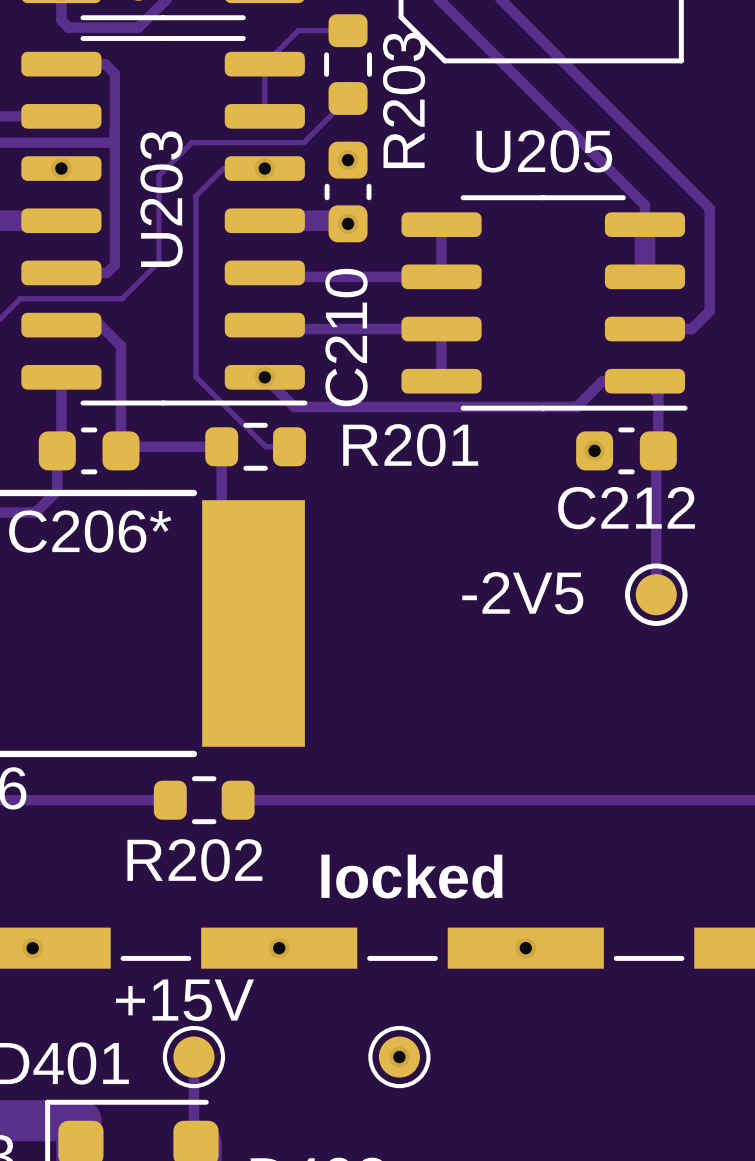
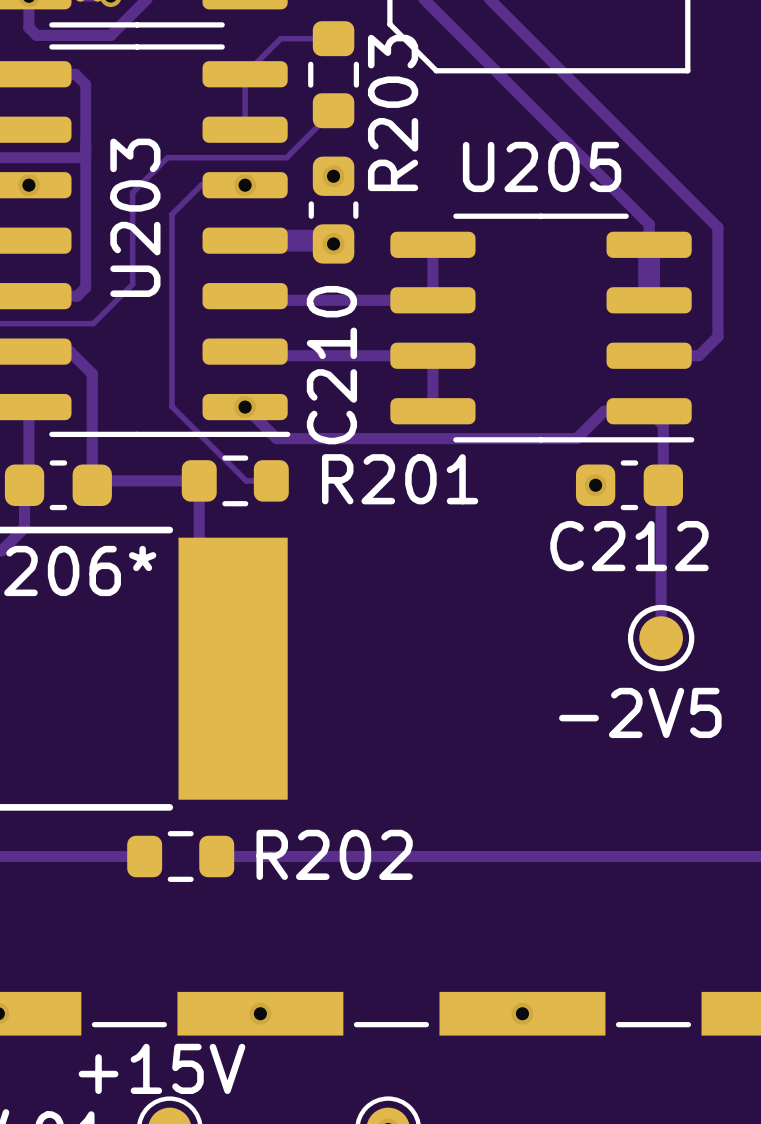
part value position: -2V5 (522, 593) -> -2V5 (640, 712)
R202 name position: R202 (194, 860) -> R202 (334, 854)
text: locked (411, 876) -> none

